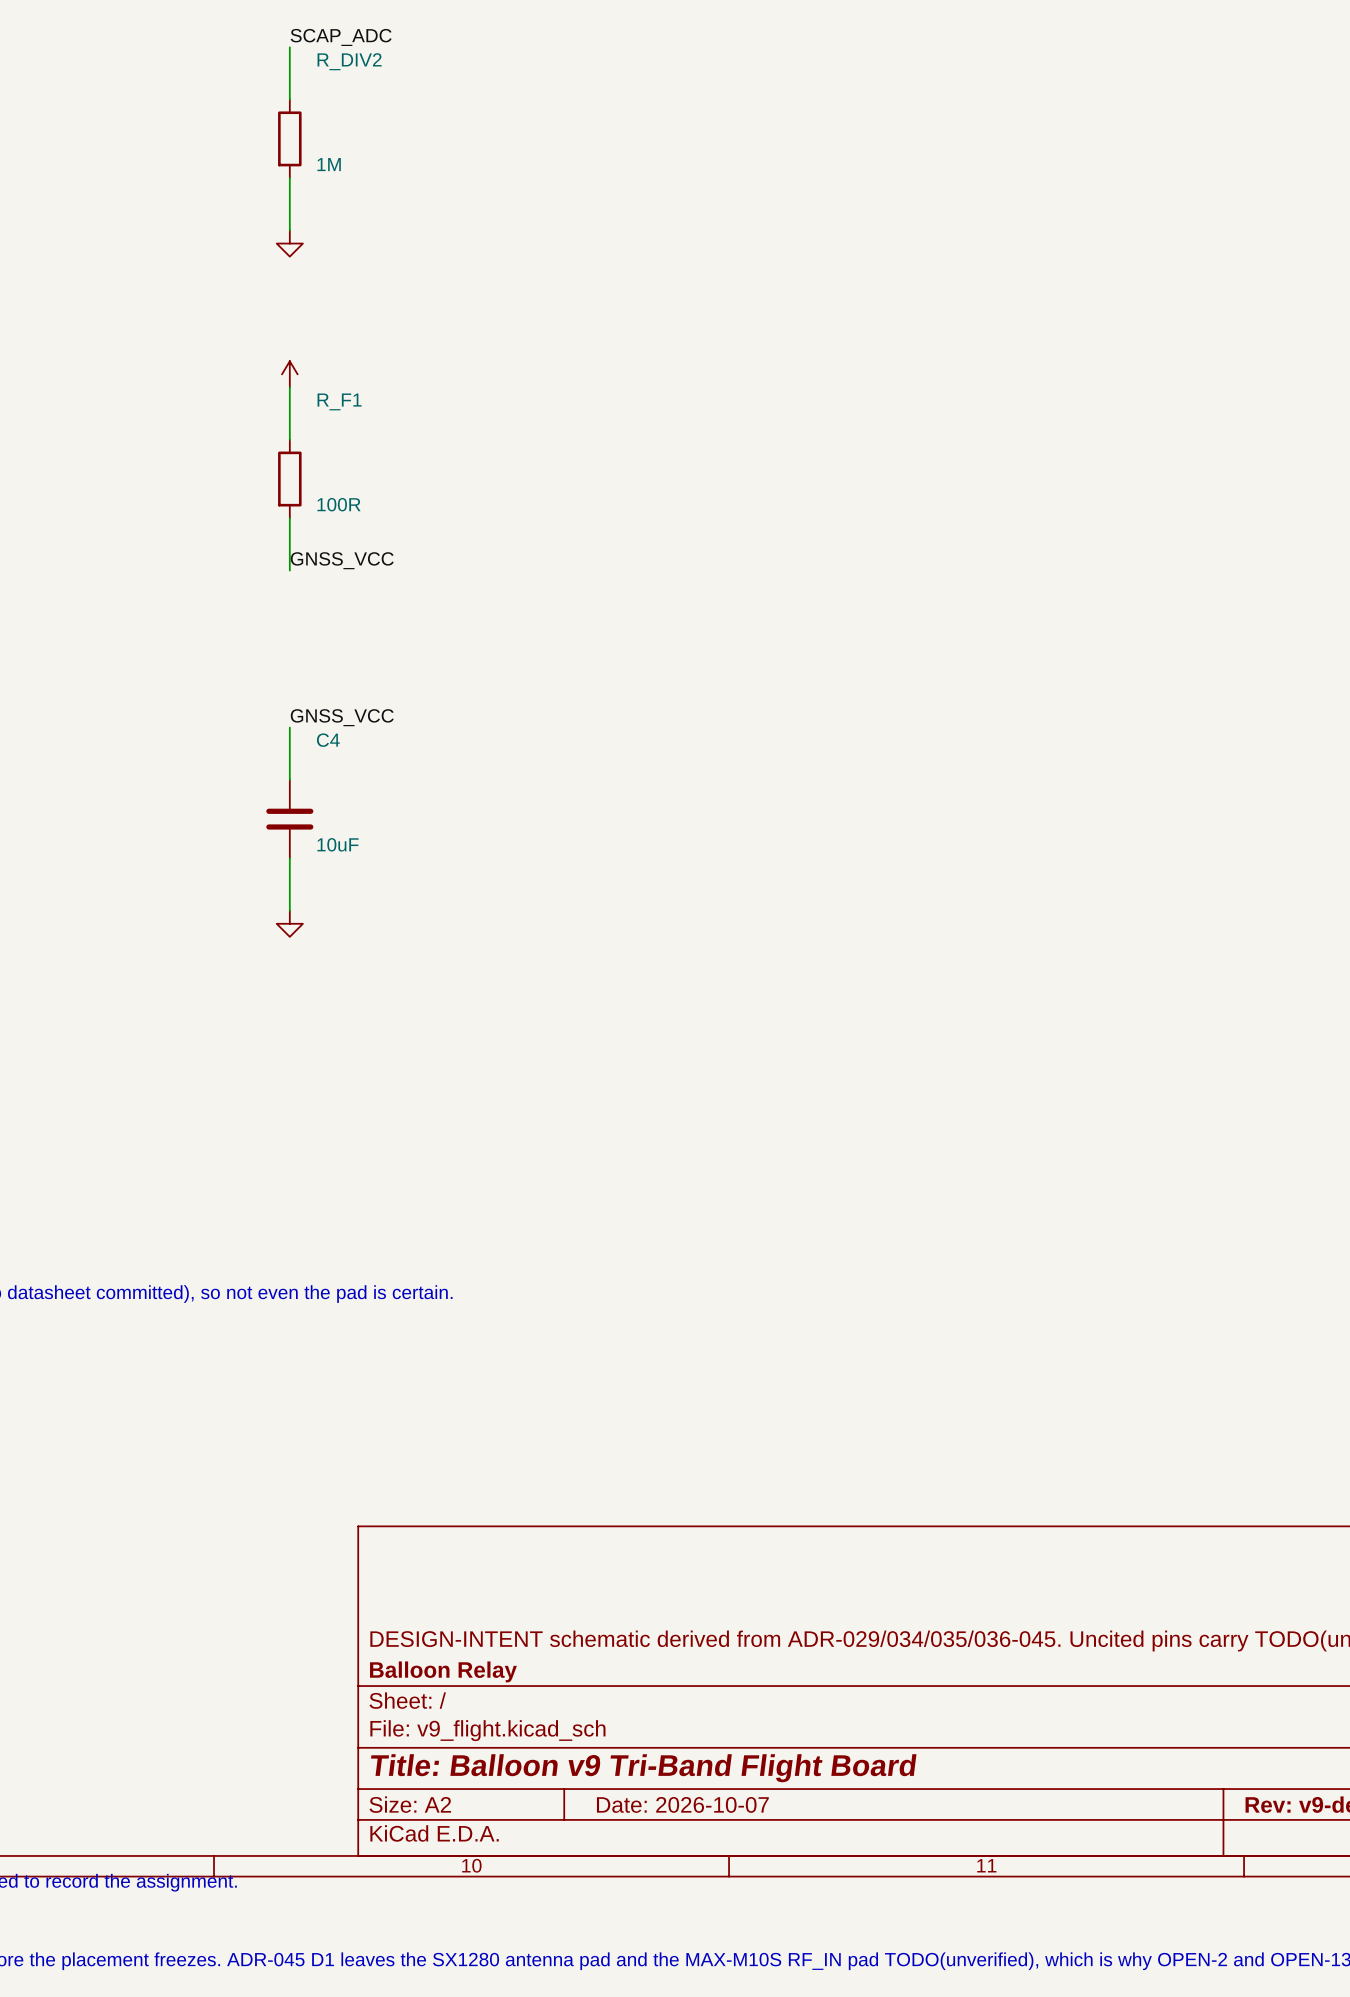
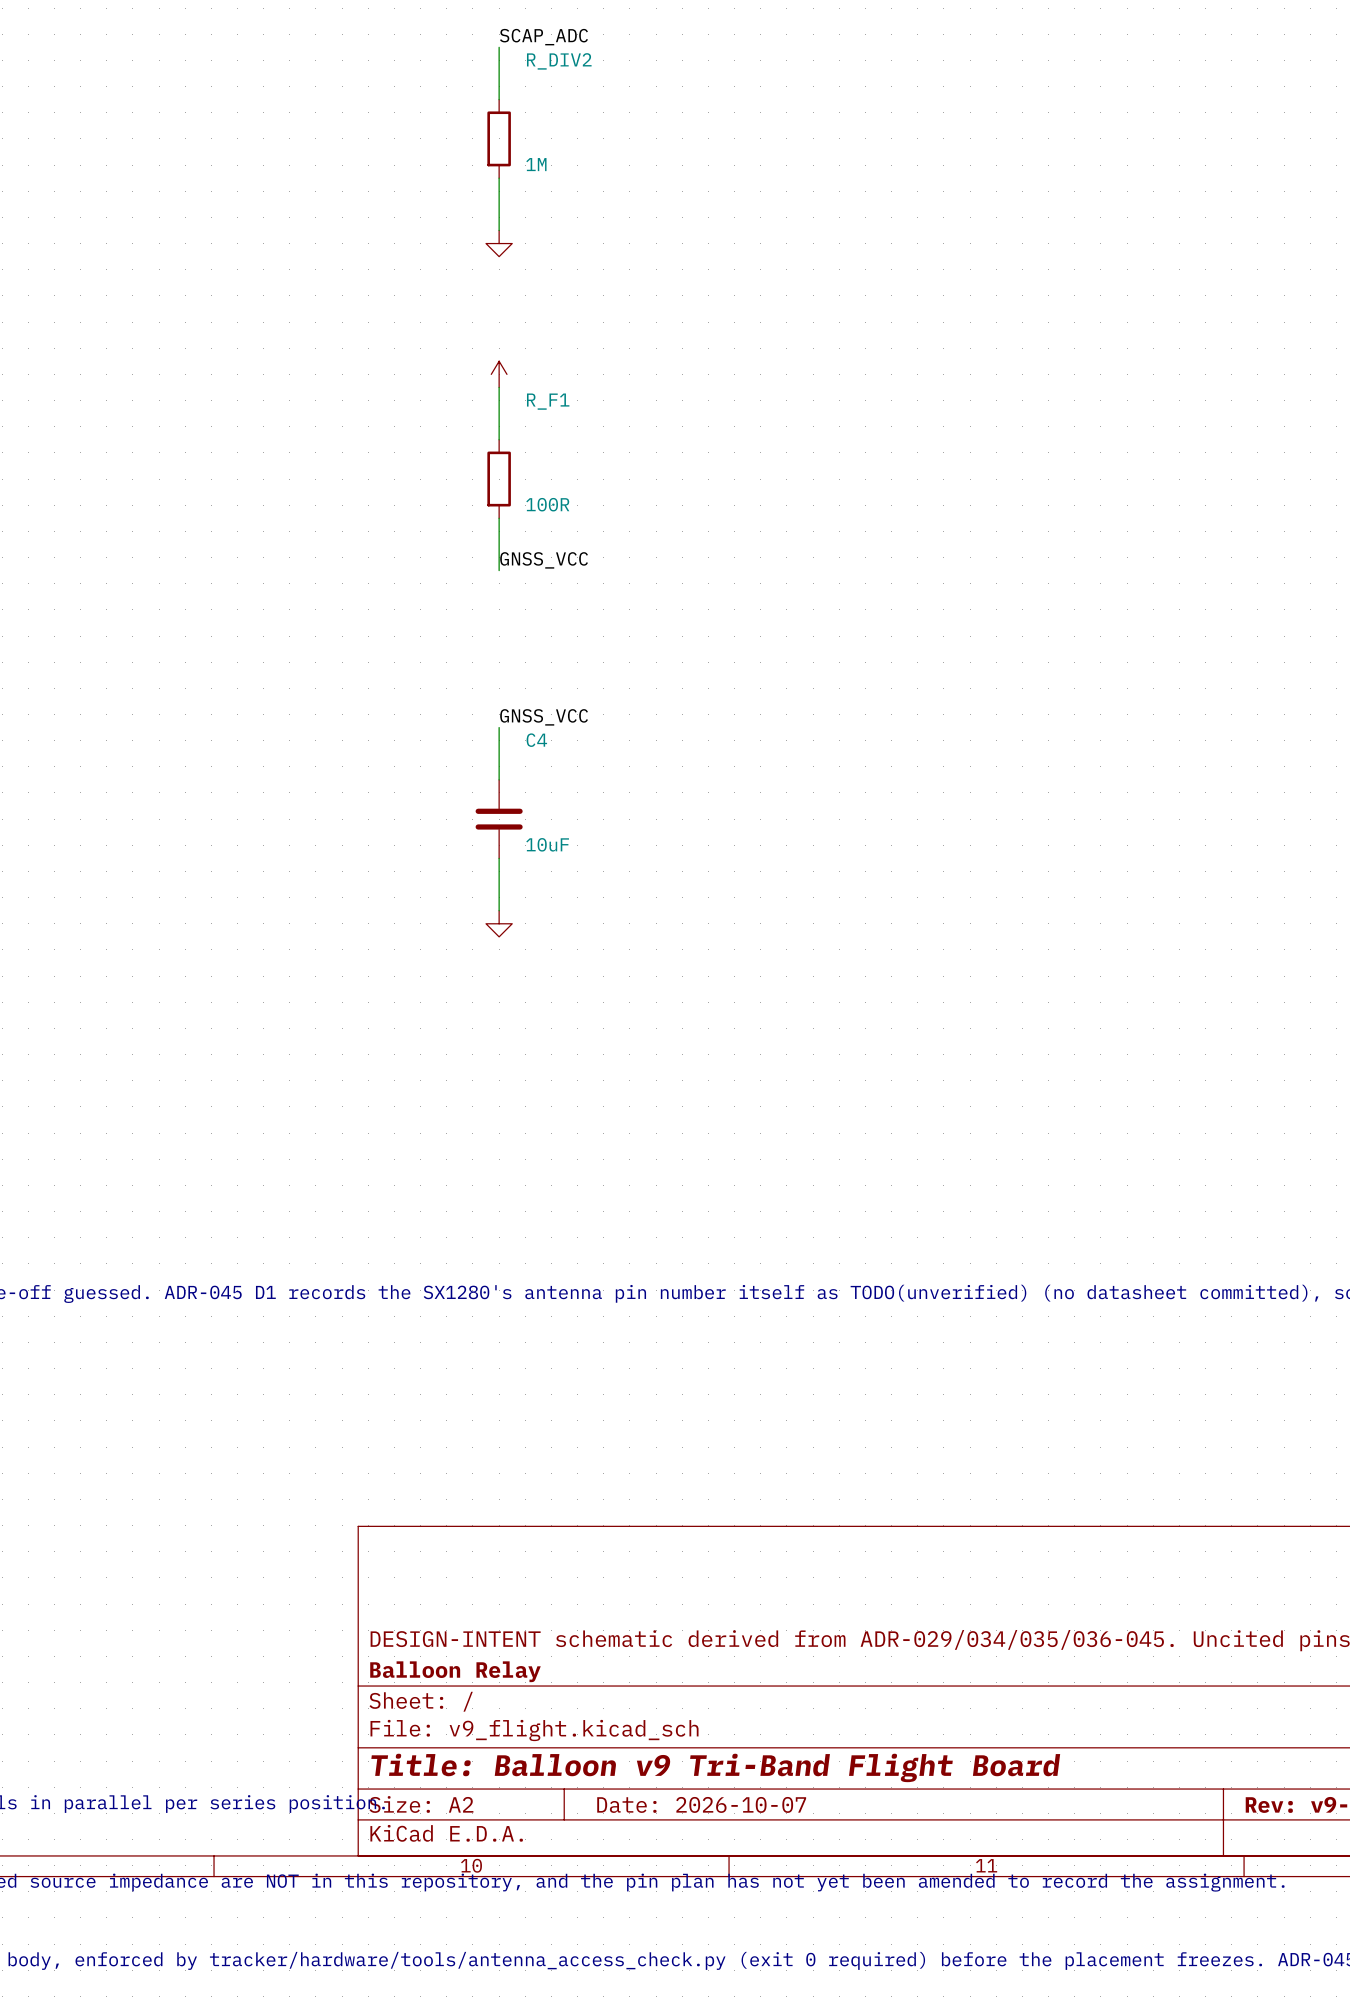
label position: SCAP_ADC (341, 37) -> SCAP_ADC (543, 37)
wire: (289, 47) (289, 99) -> (499, 47) (499, 99)
R_DIV2 position: (289, 138) -> (499, 138)
wire: (289, 178) (289, 230) -> (499, 178) (499, 230)
power symbol position: (289, 243) -> (499, 243)
power symbol position: (289, 374) -> (499, 374)
wire: (289, 387) (289, 439) -> (499, 387) (499, 439)
R_F1 position: (289, 479) -> (499, 479)
wire: (289, 518) (289, 570) -> (499, 518) (499, 570)
label: GNSS_VCC (342, 560) -> none
label: none -> GNSS_VCC (544, 560)
label: GNSS_VCC (342, 717) -> none
label: none -> GNSS_VCC (544, 717)
wire: (289, 727) (289, 779) -> (499, 727) (499, 779)
C4 position: (289, 819) -> (499, 819)
wire: (289, 858) (289, 910) -> (499, 858) (499, 910)
power symbol position: (289, 923) -> (499, 923)

